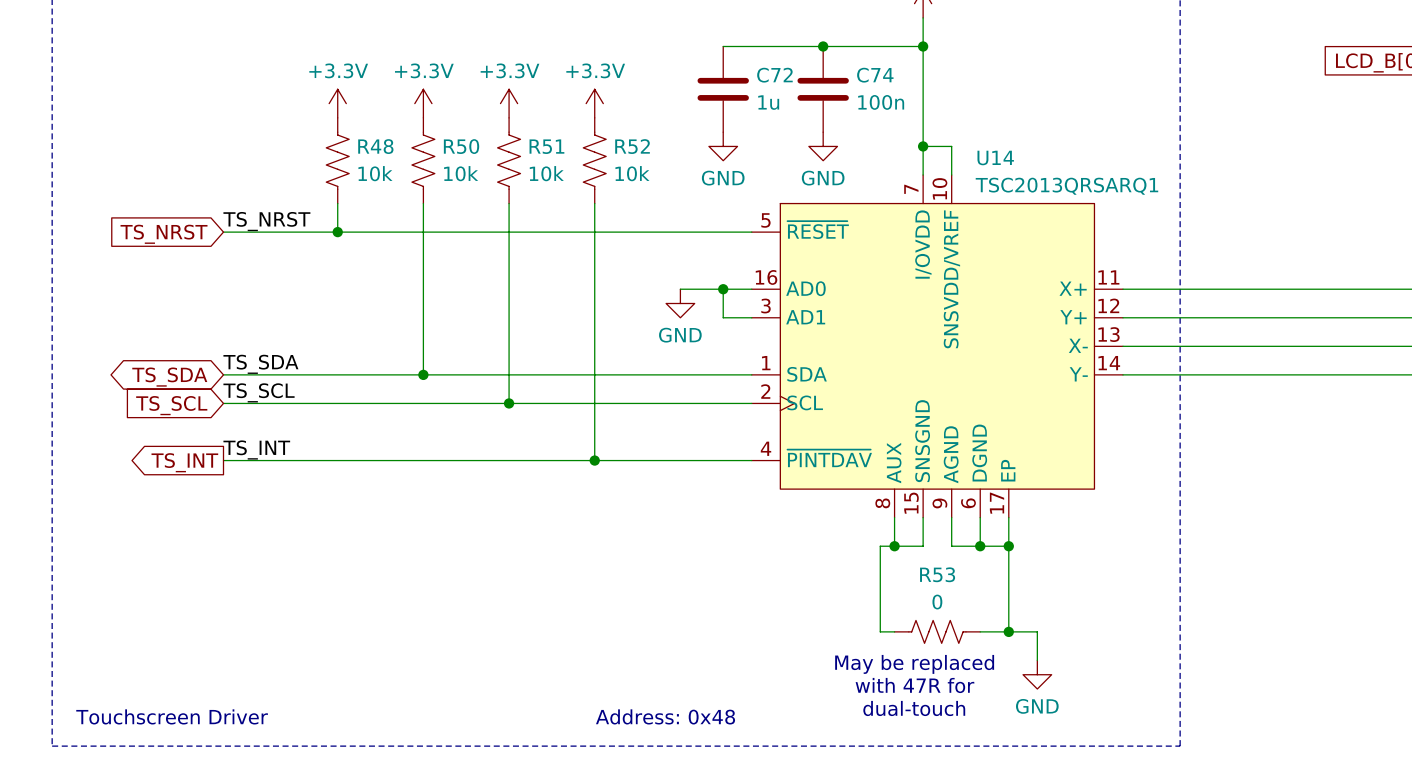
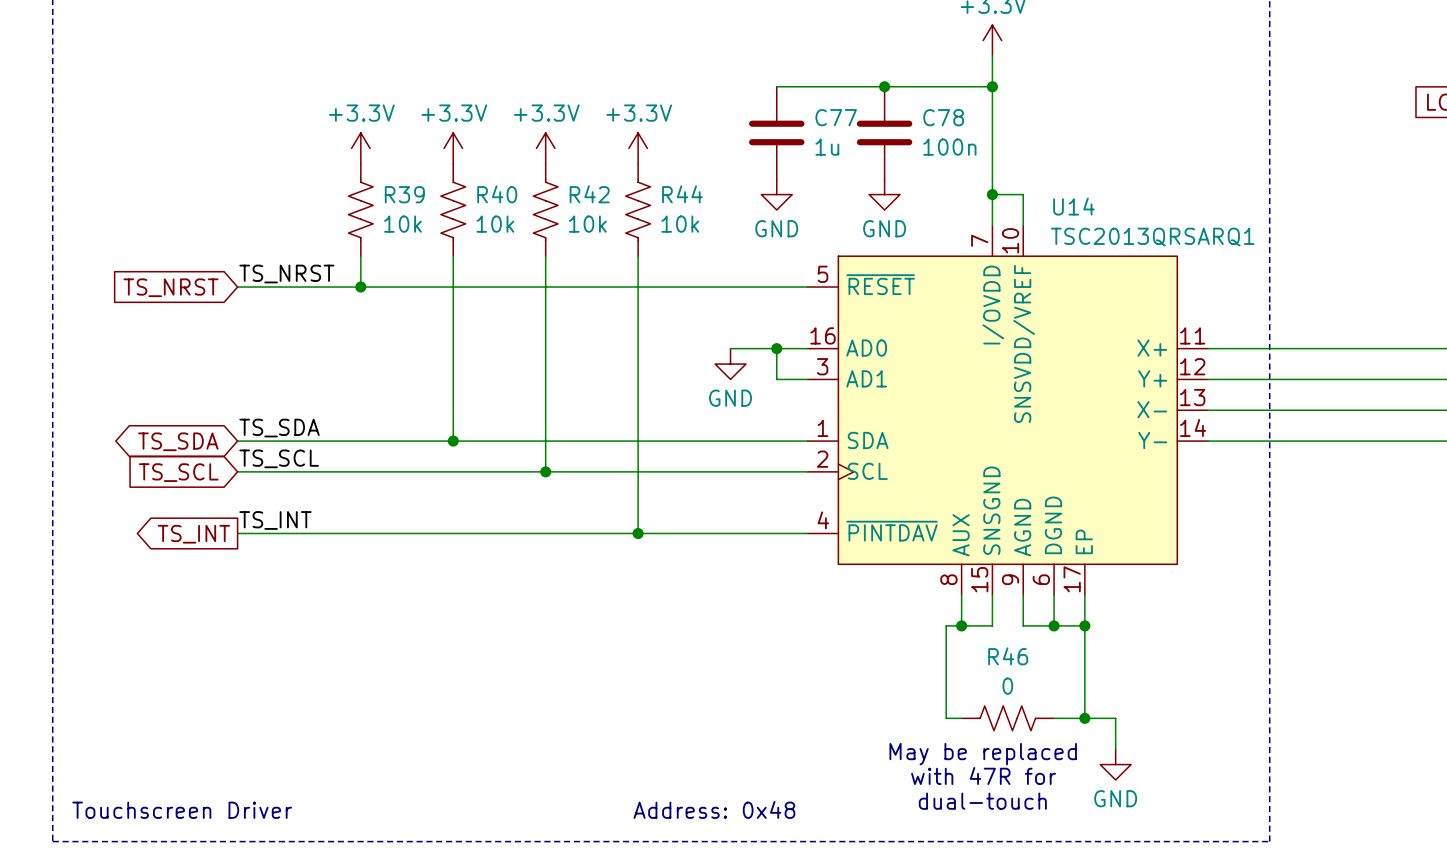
C72 name: C72 (774, 75) -> C77 (836, 117)
C74 name: C74 (875, 75) -> C78 (943, 117)
R48 name: R48 (375, 146) -> R39 (404, 194)
R50 name: R50 (461, 146) -> R40 (497, 194)
R51 name: R51 (546, 146) -> R42 (589, 194)
R52 name: R52 (632, 146) -> R44 (682, 194)
R53 name: R53 (937, 574) -> R46 (1008, 656)

